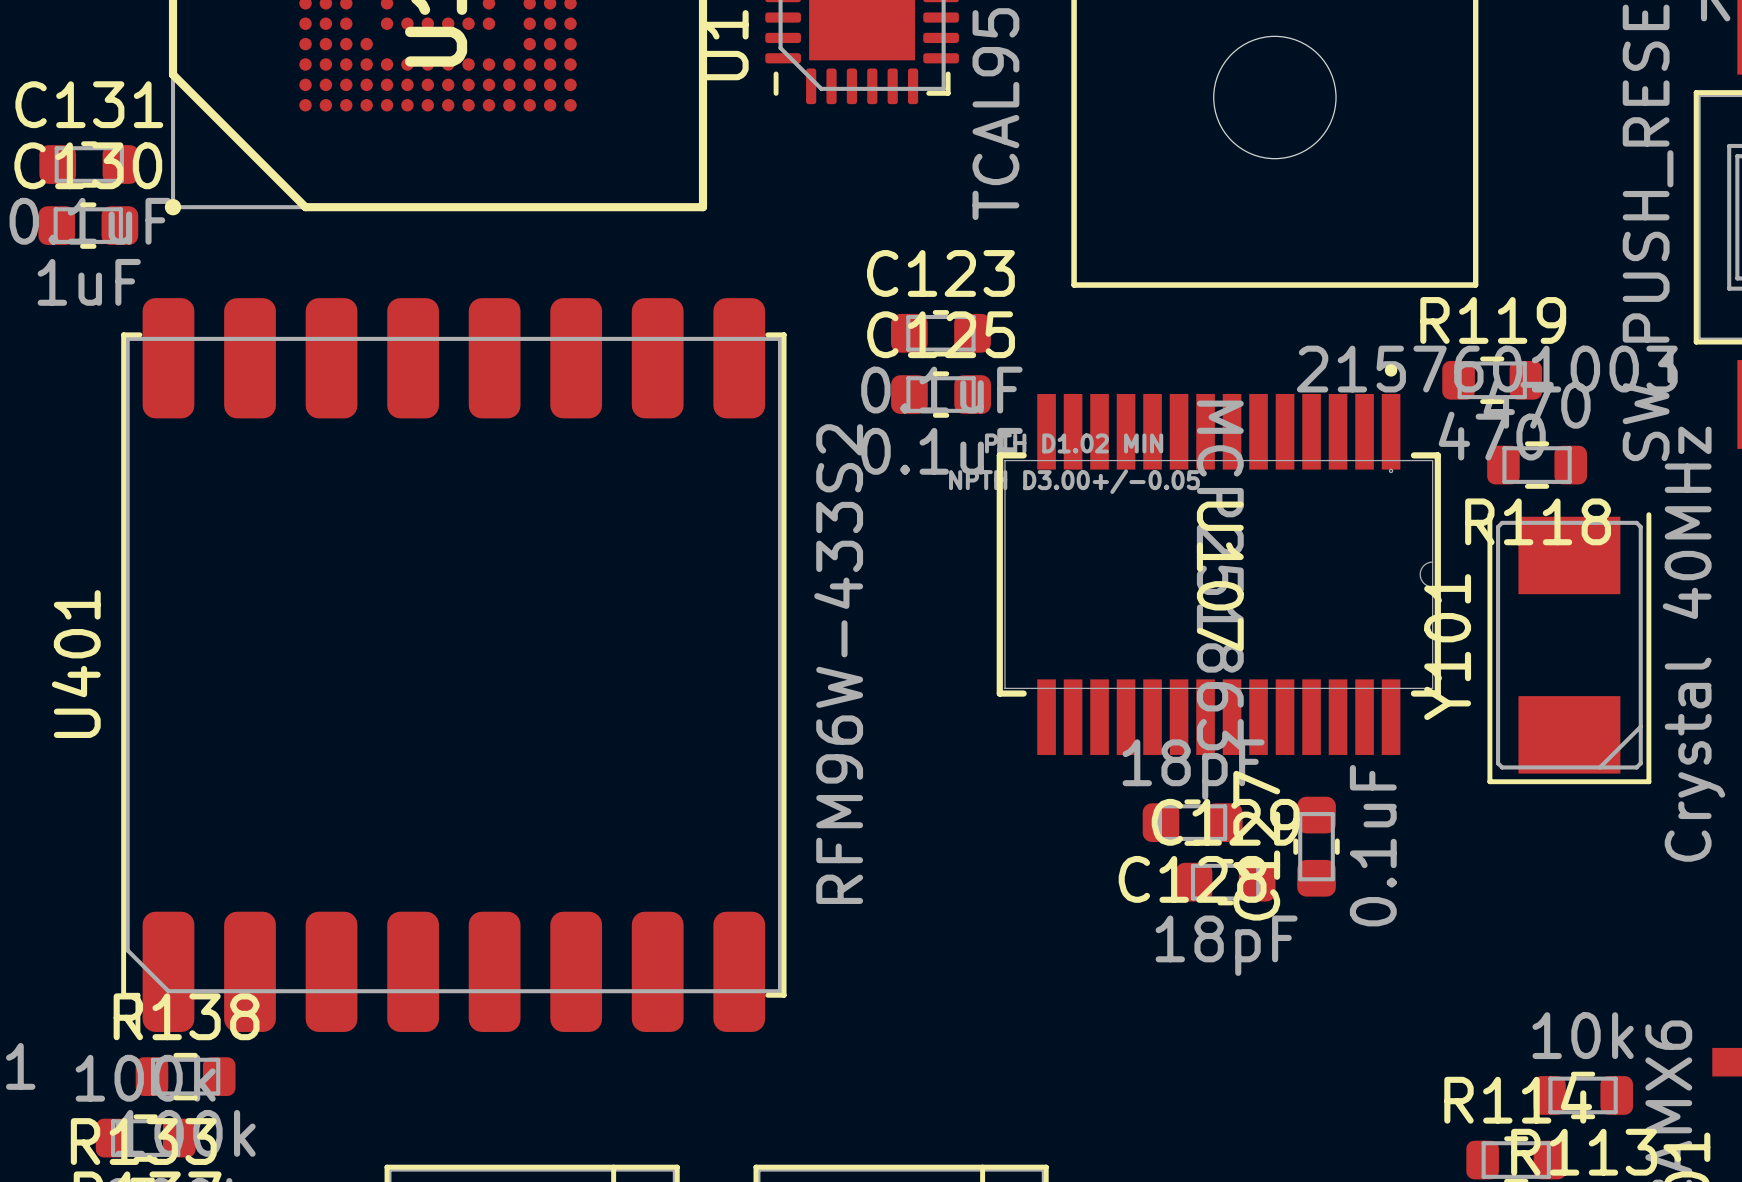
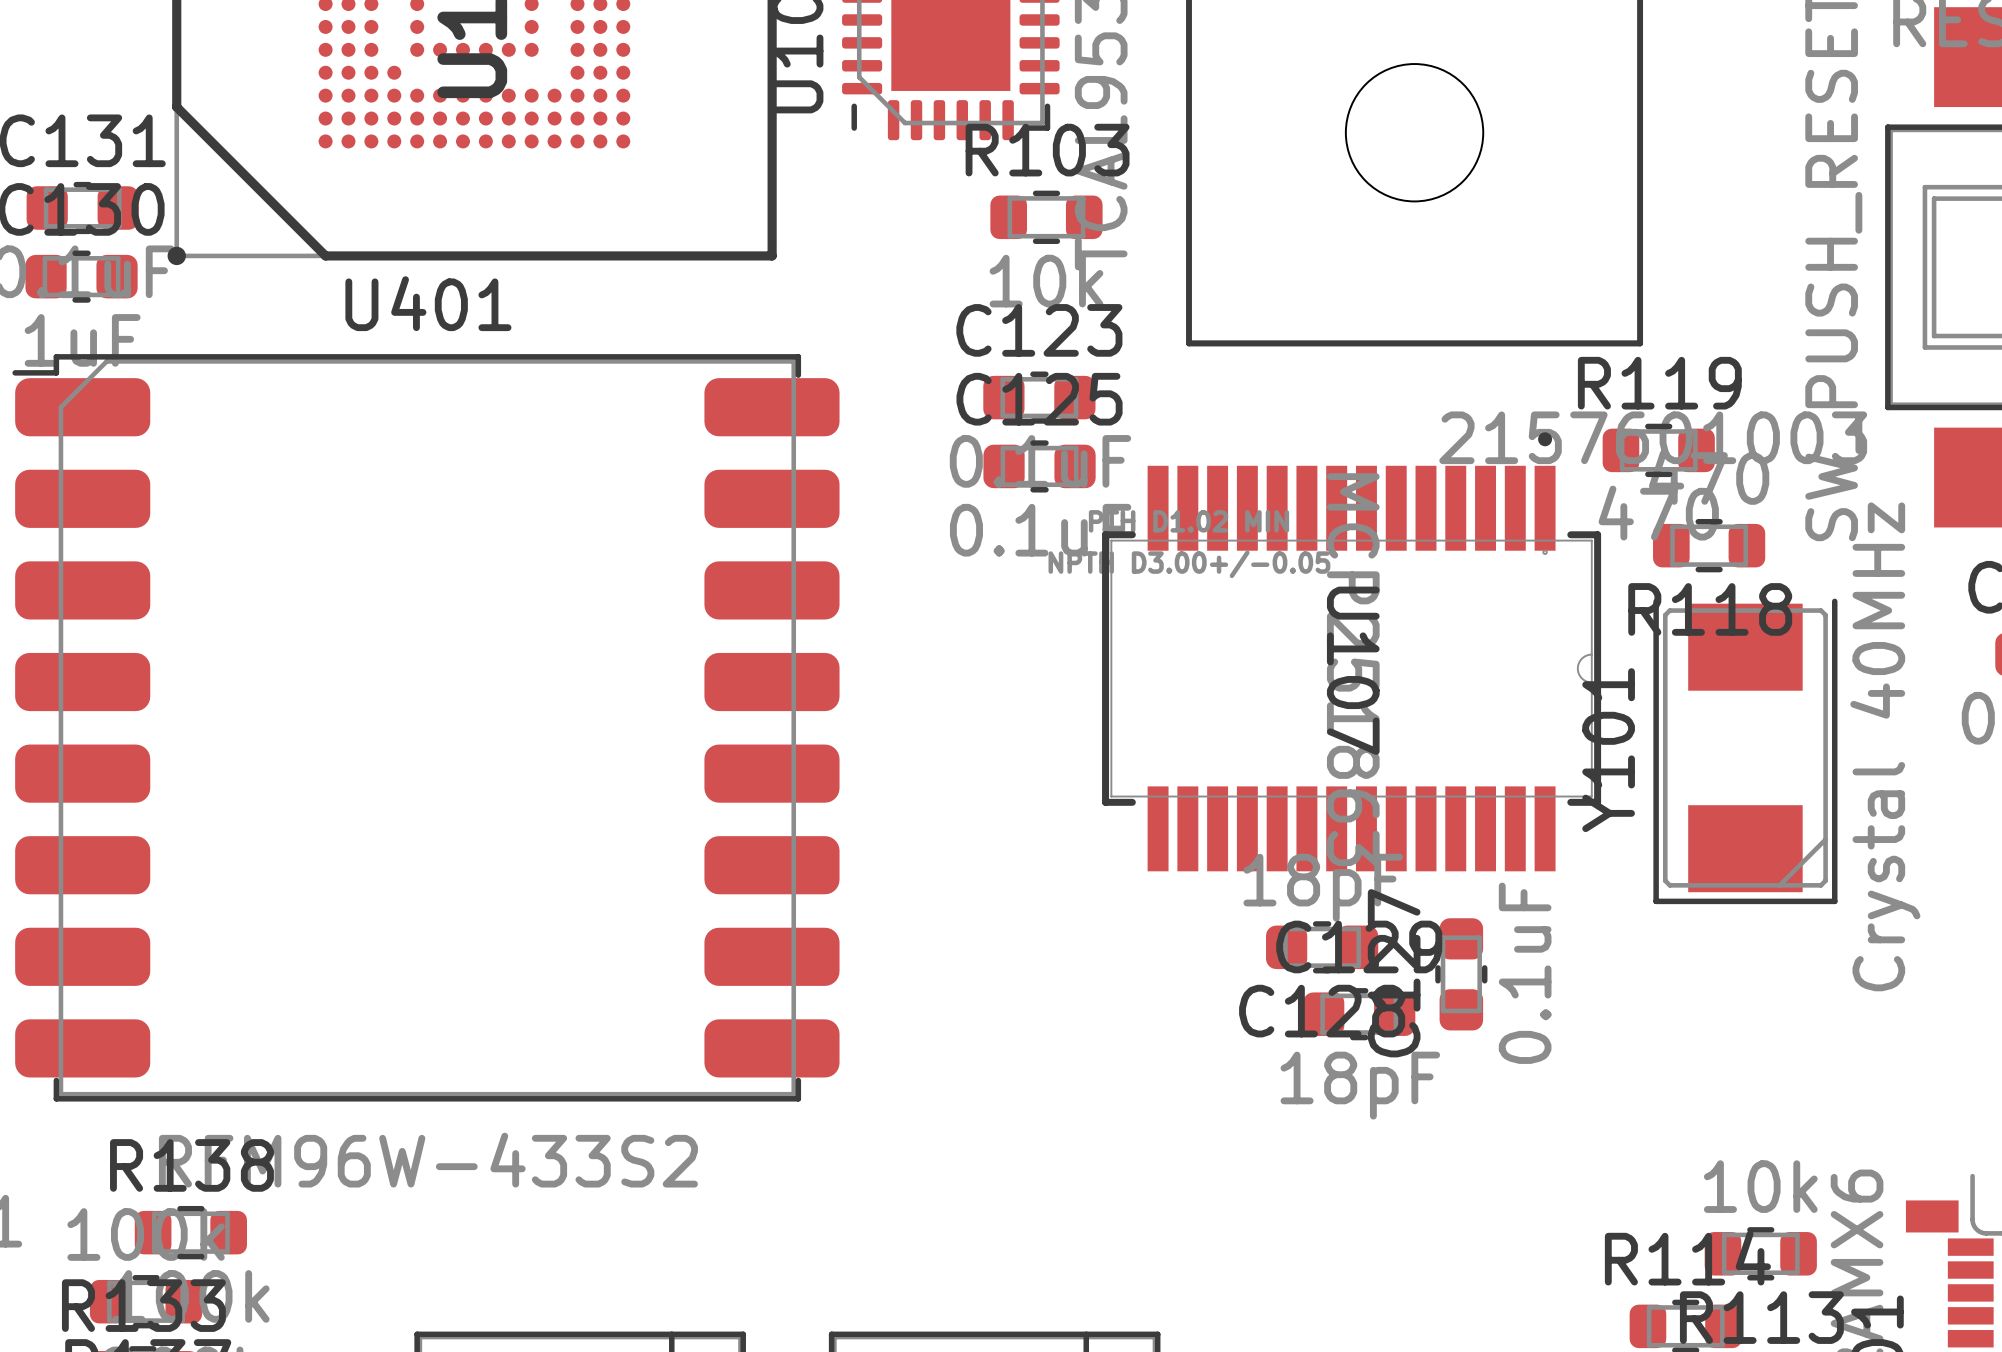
R103: none -> 10k (1046, 217)
U401 rotation: 0° (453, 666) -> 90° clockwise (425, 727)

